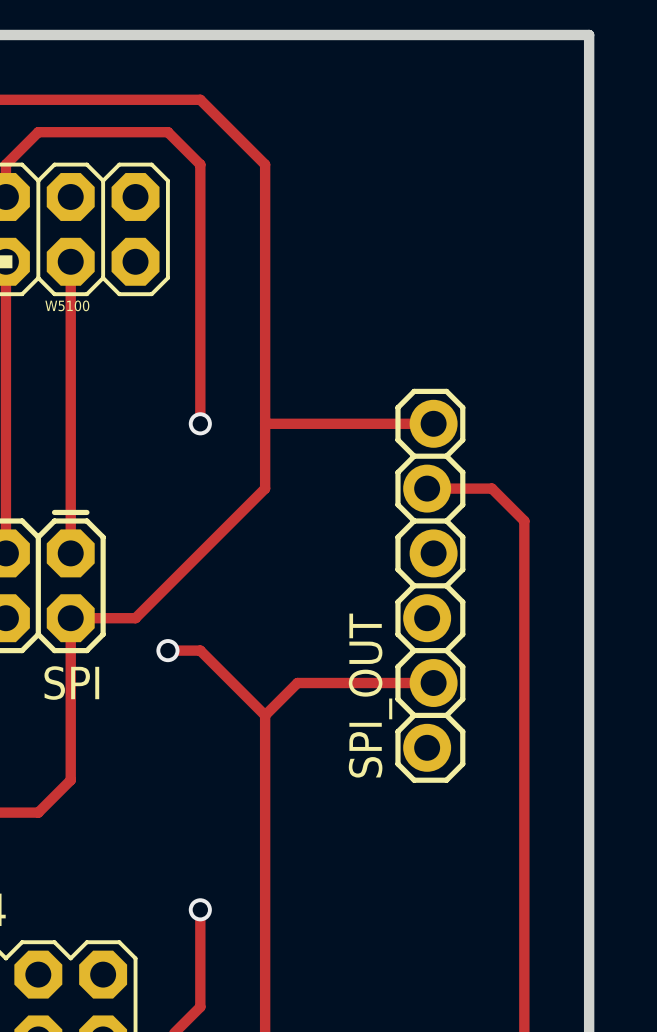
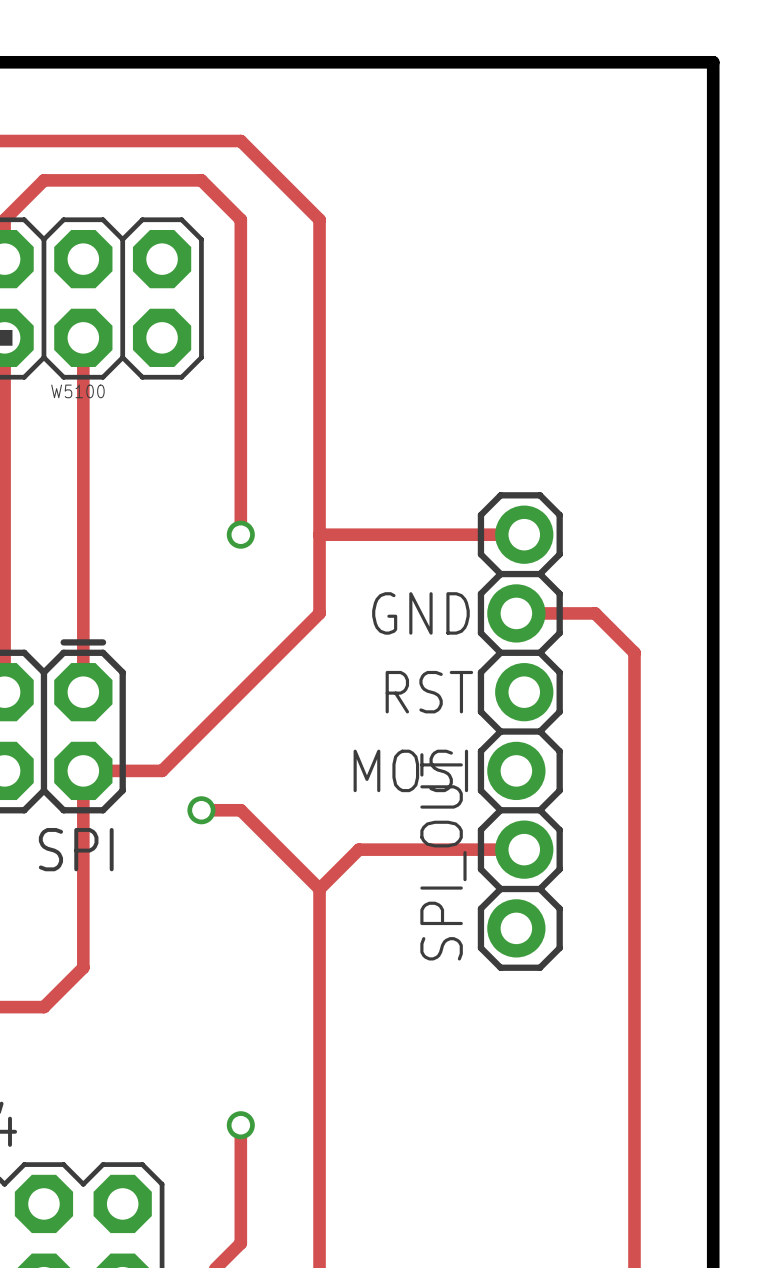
text: none -> GND (420, 613)
text: none -> RST (429, 692)
text: none -> MOSI (410, 770)

